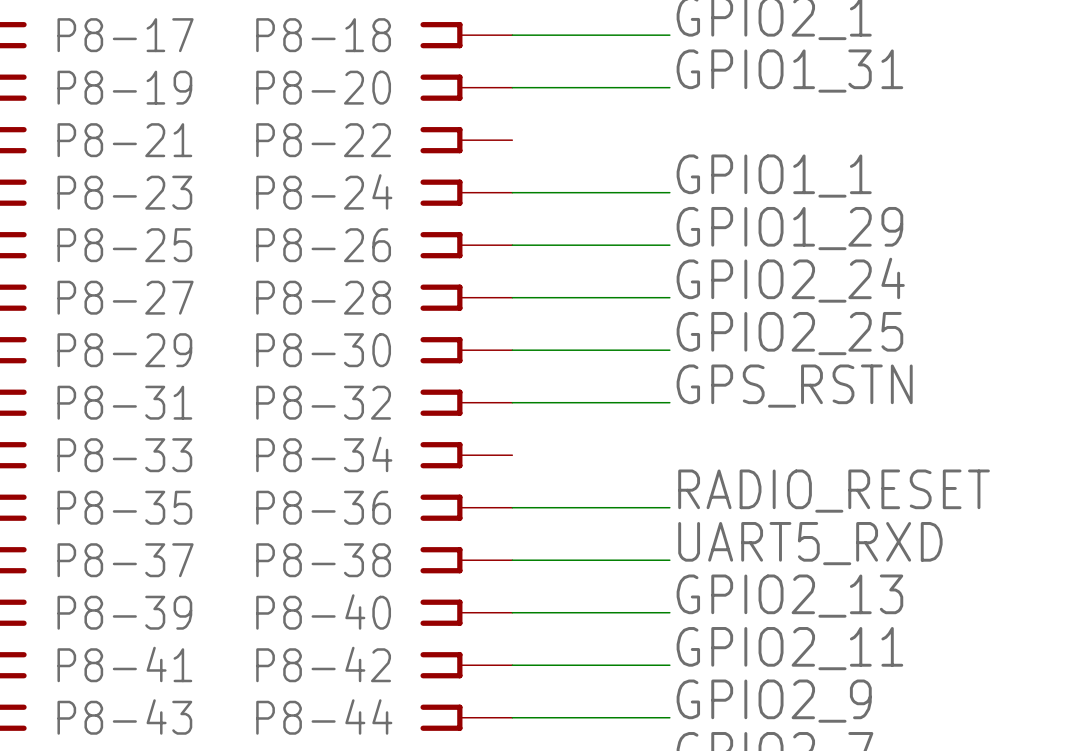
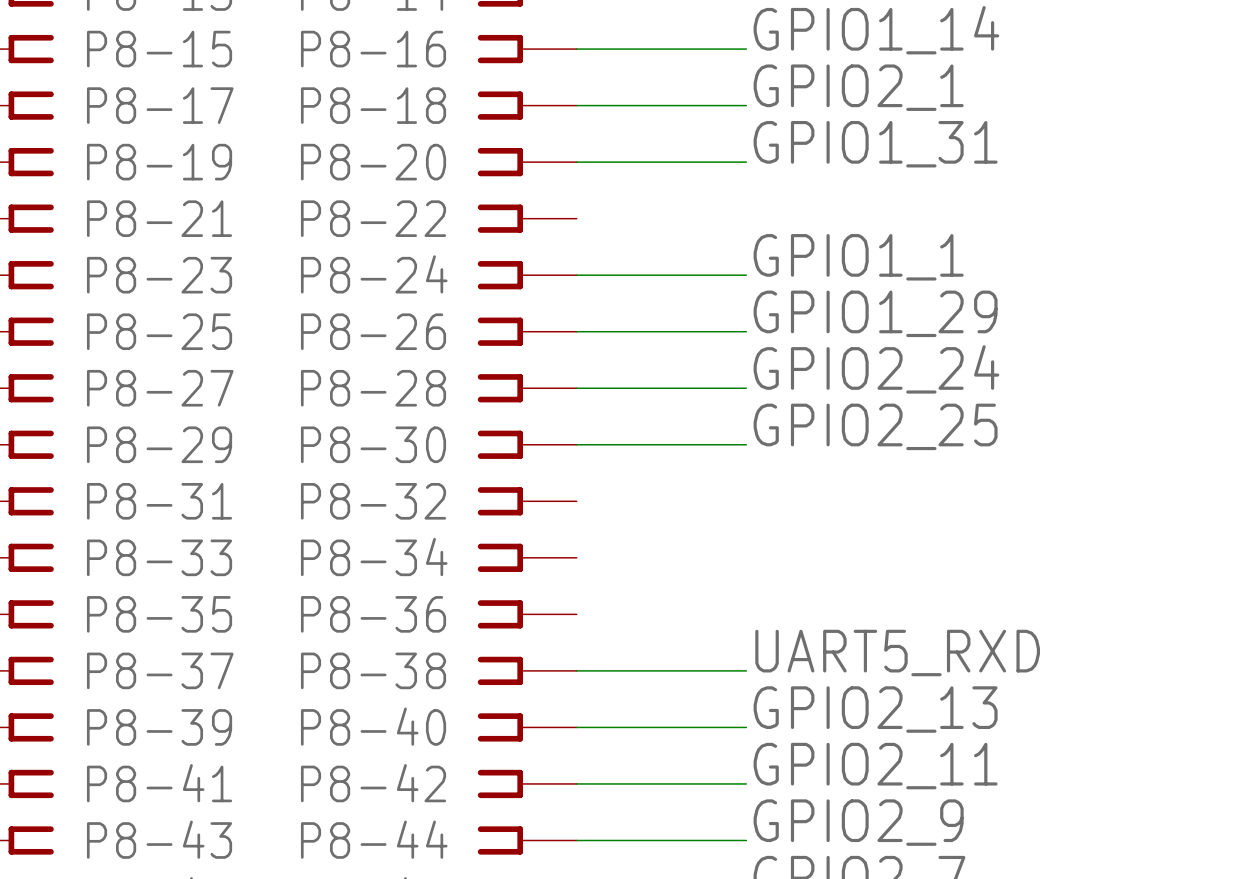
label: GPS_RSTN (794, 386) -> none
wire: (512, 402) (669, 402) -> none
label: RADIO_RESET (834, 491) -> none
wire: (512, 507) (669, 507) -> none

